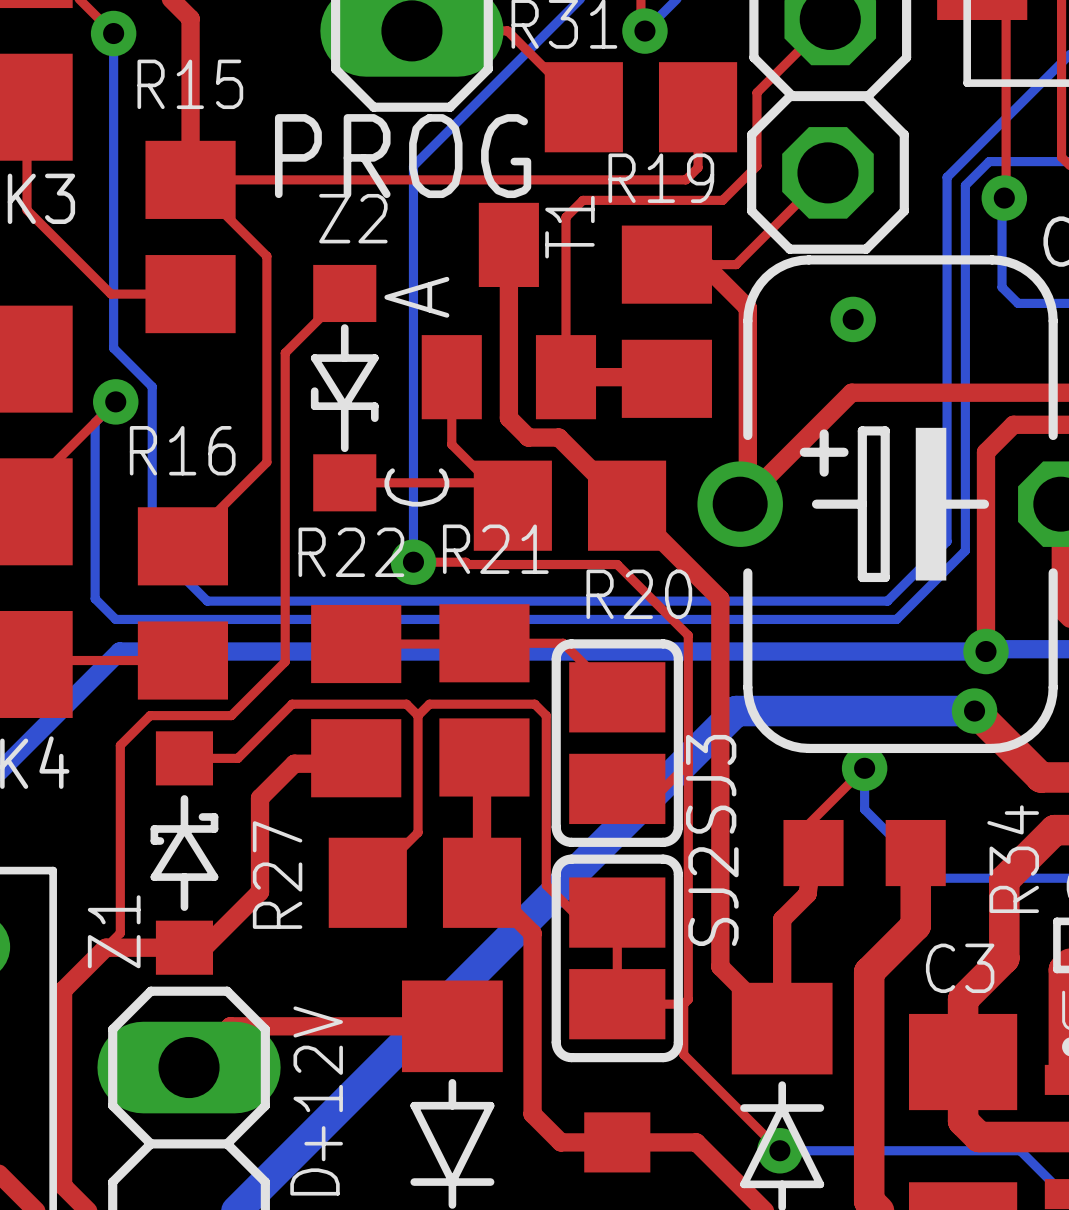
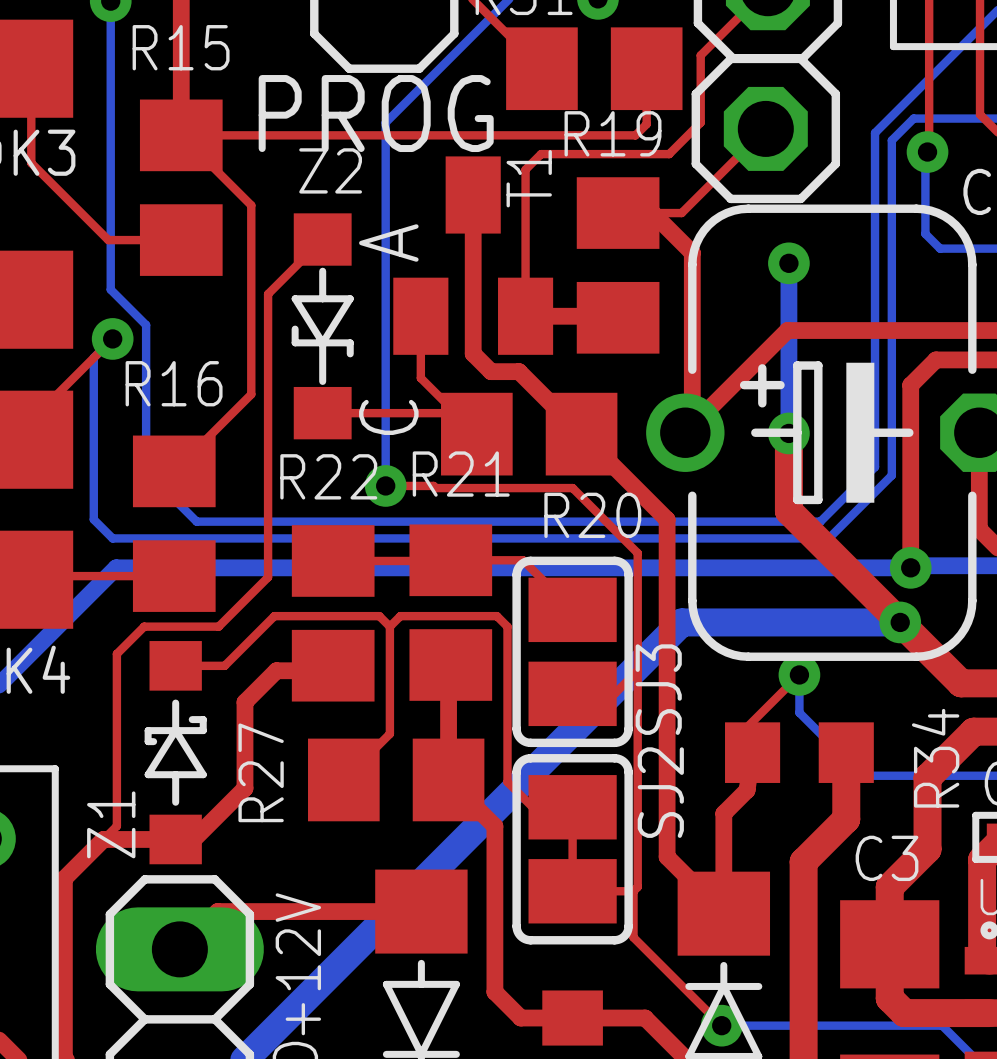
bottom track: none -> (788, 263) (788, 433)
top track: none -> (788, 433) (788, 511) (900, 622)
via: none -> (788, 433)

